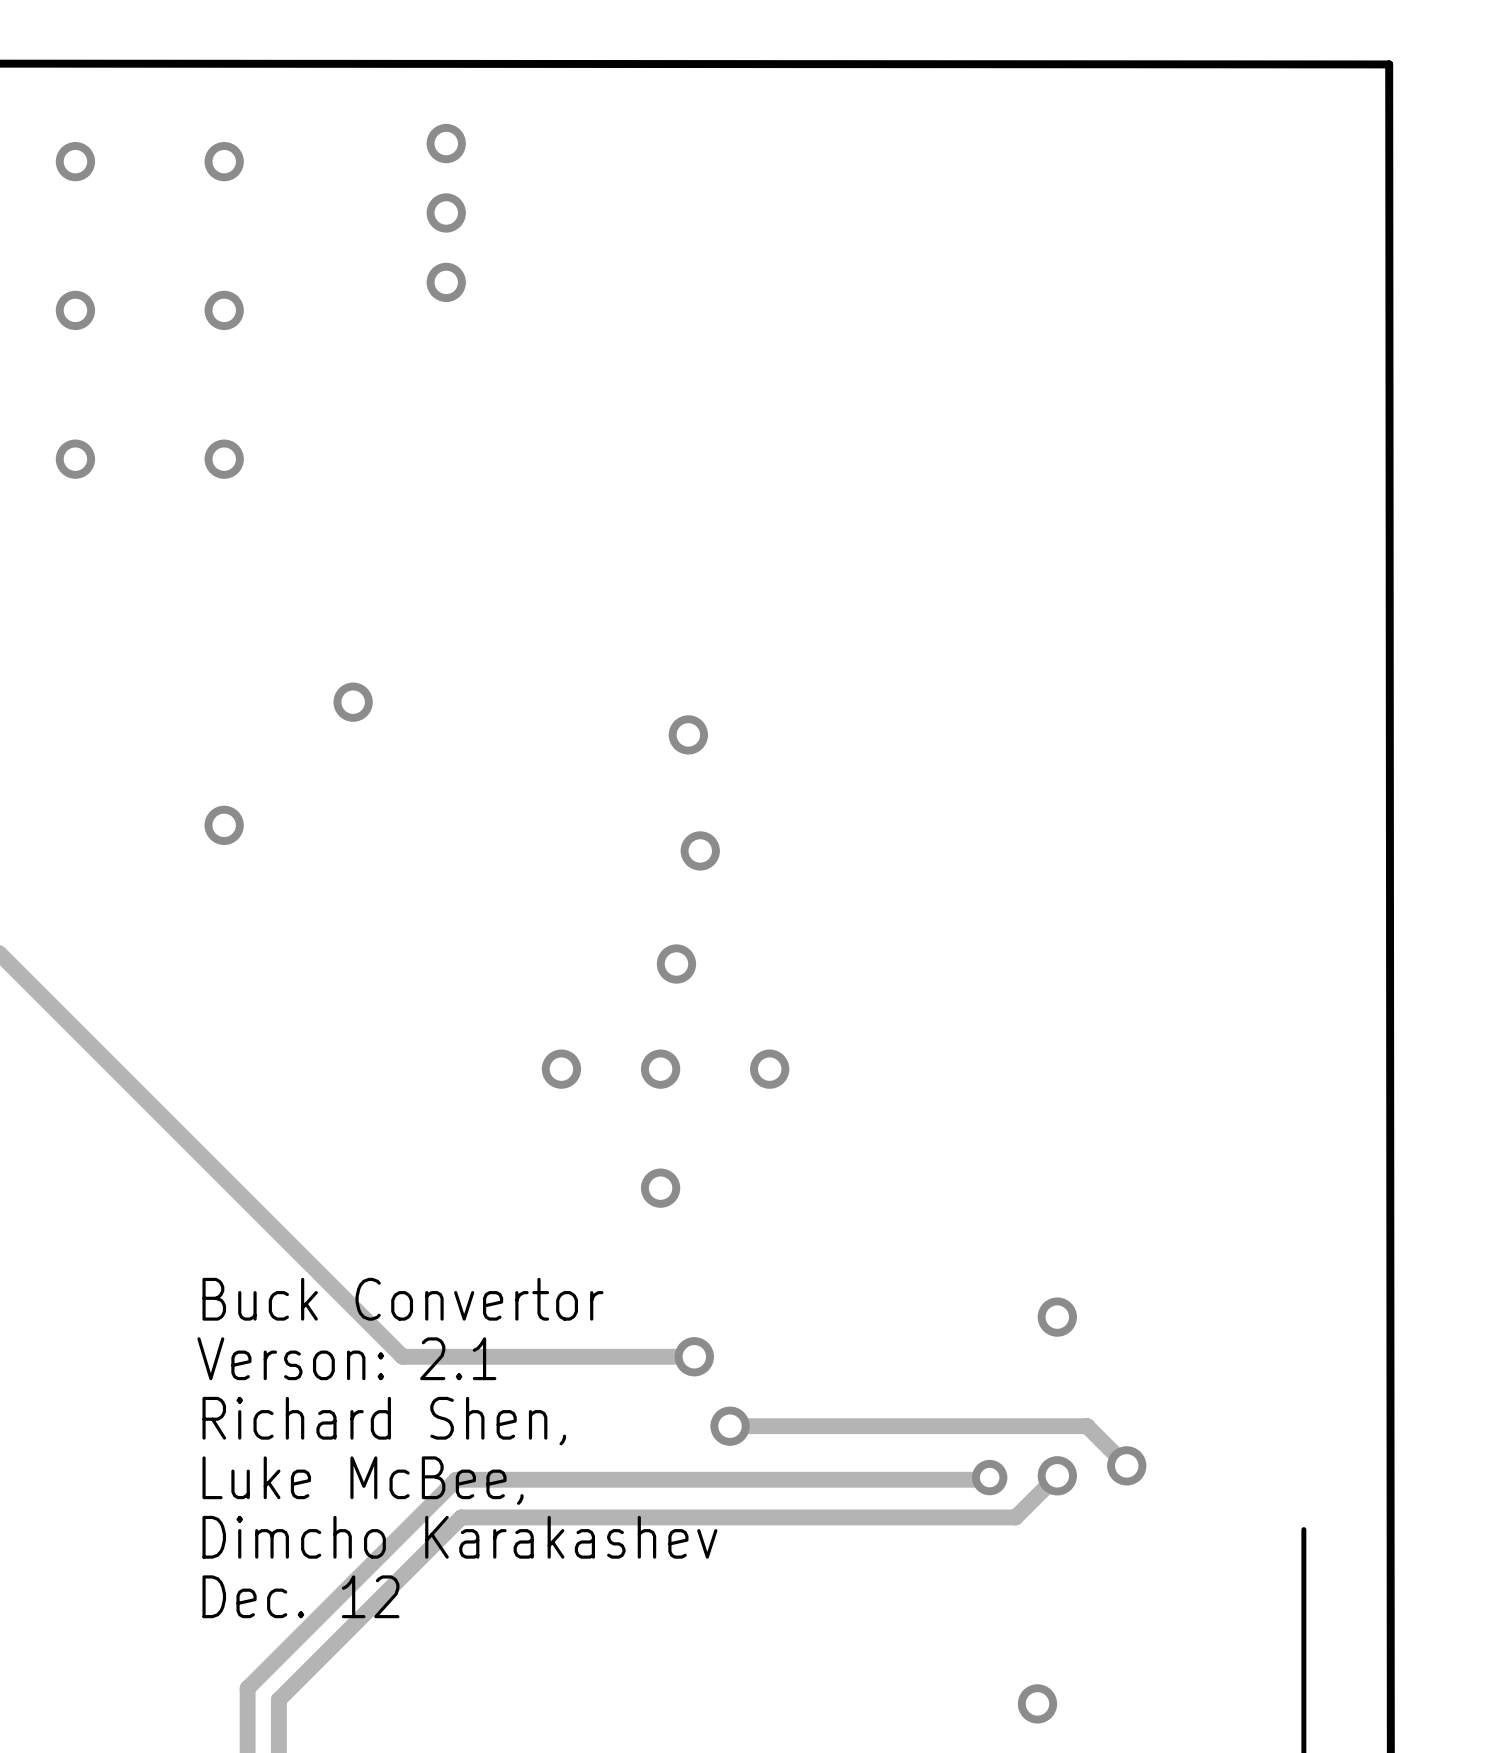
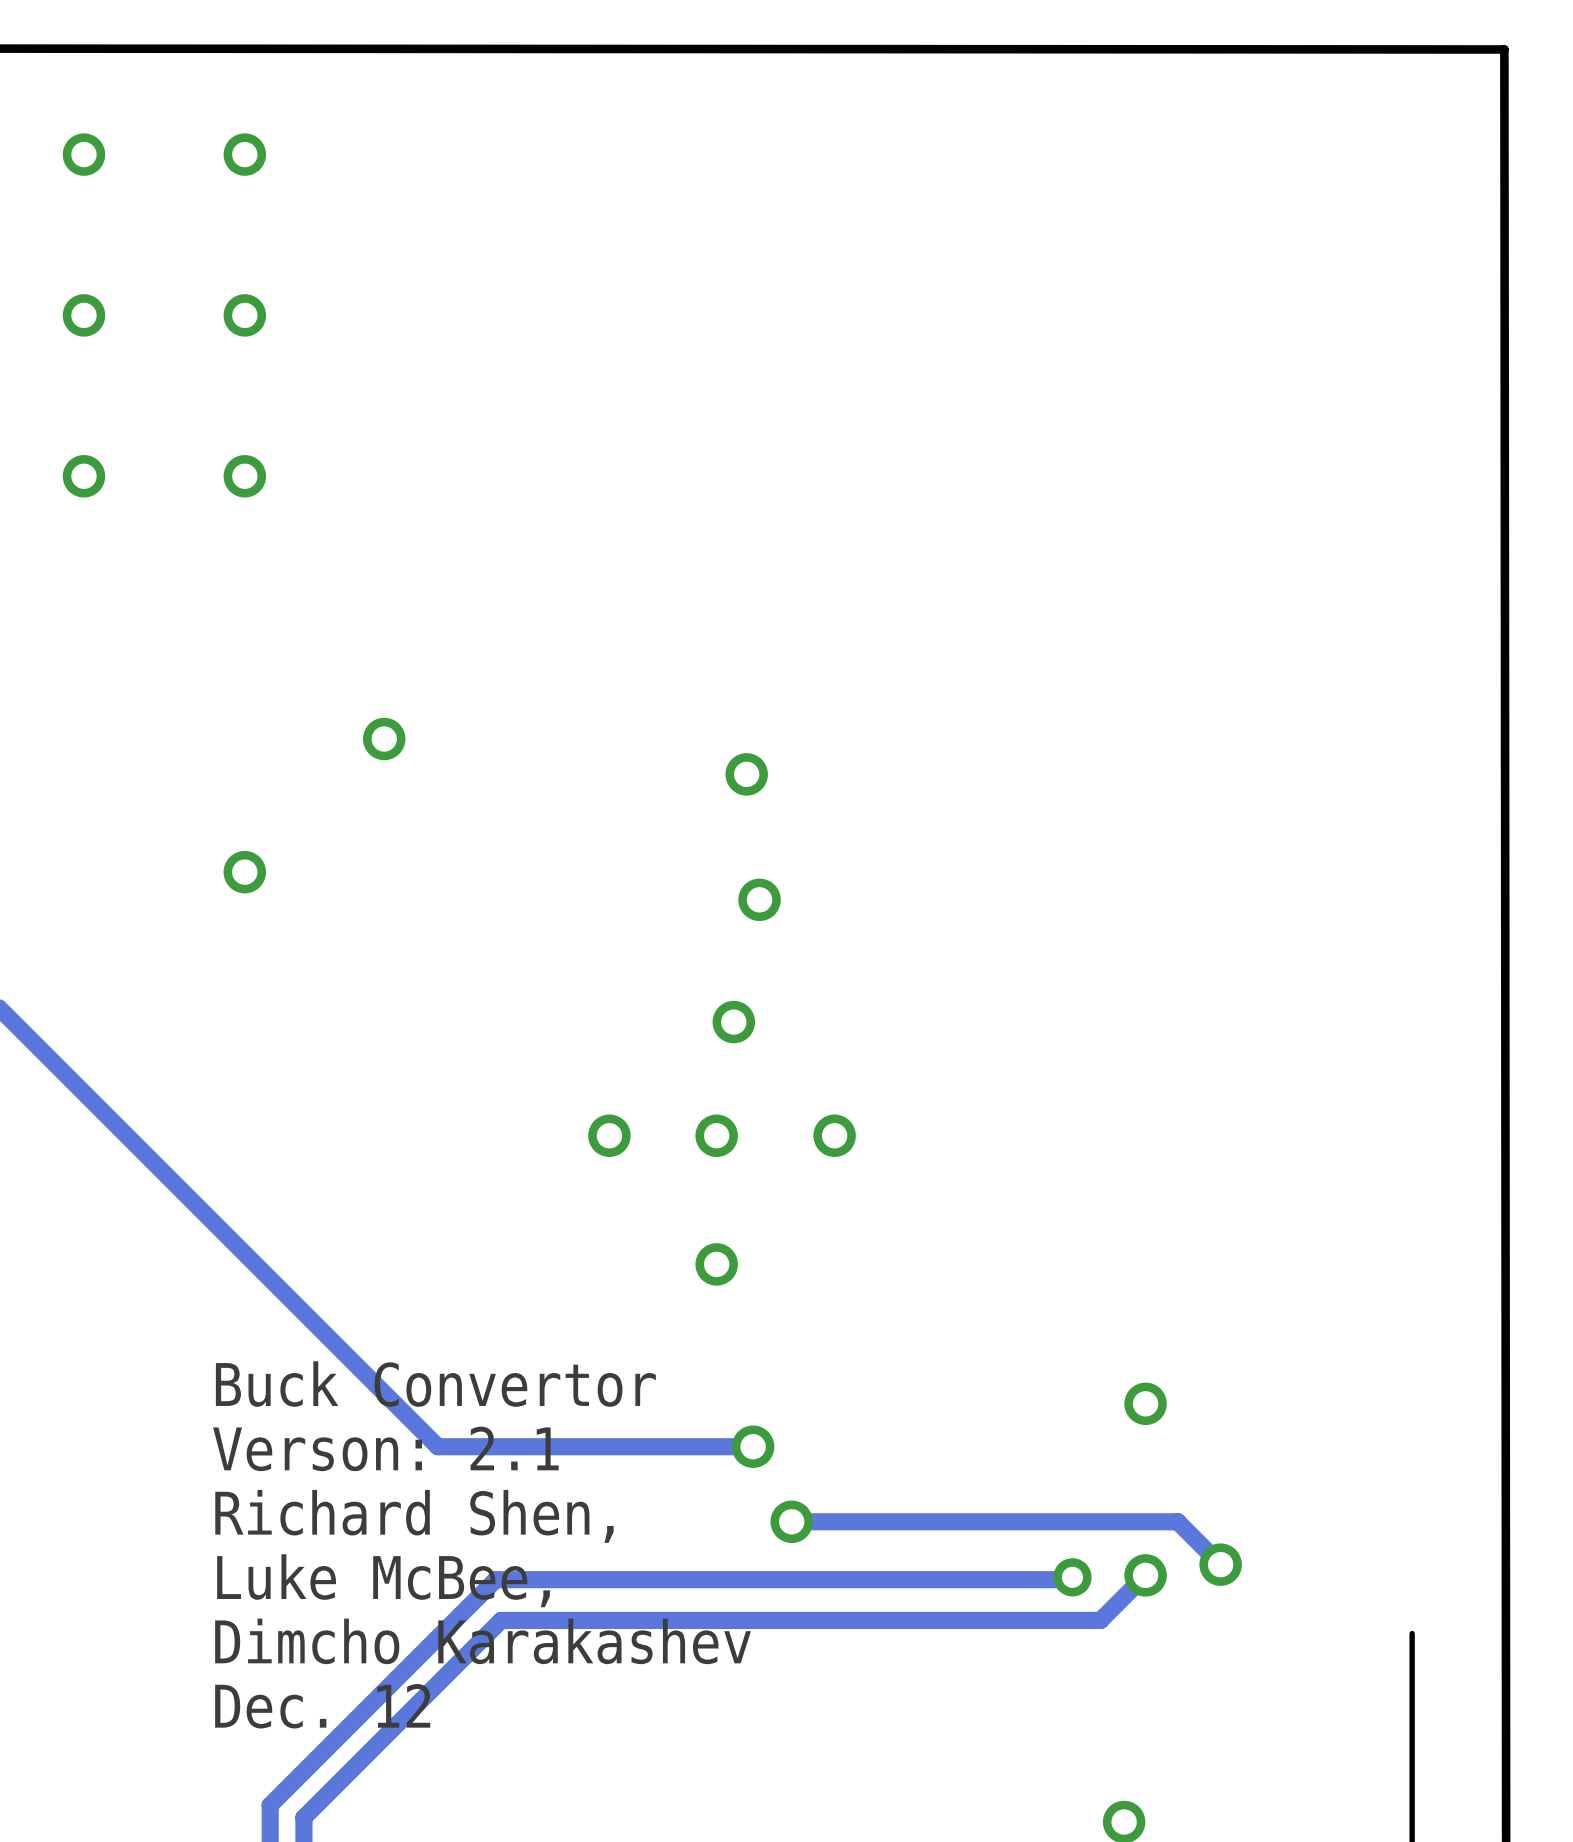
via: (446, 143) -> none
via: (446, 212) -> none
via: (446, 282) -> none

